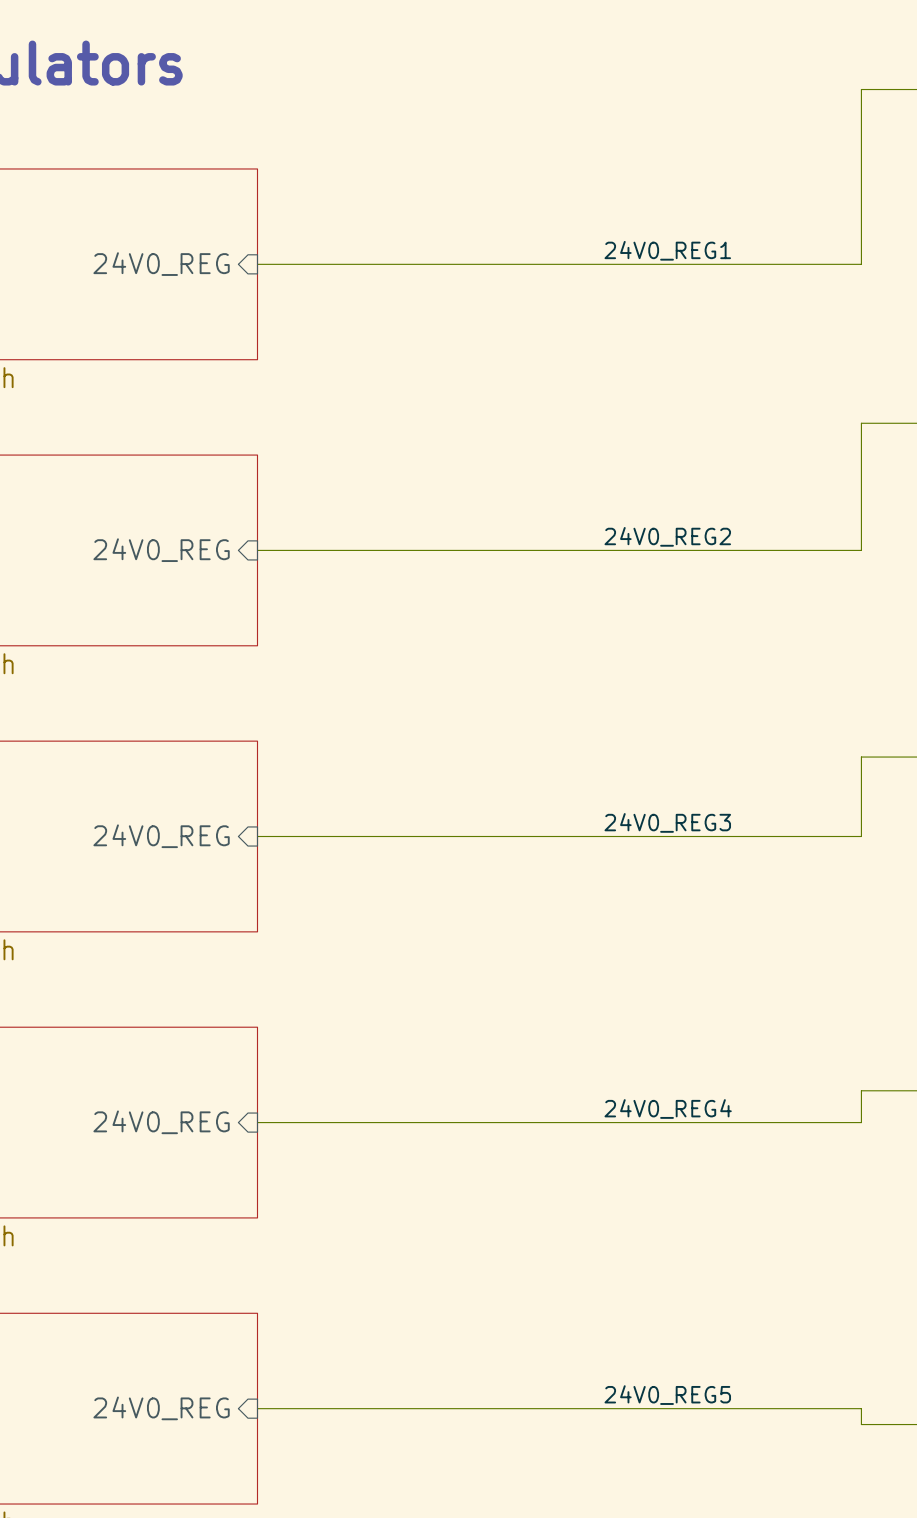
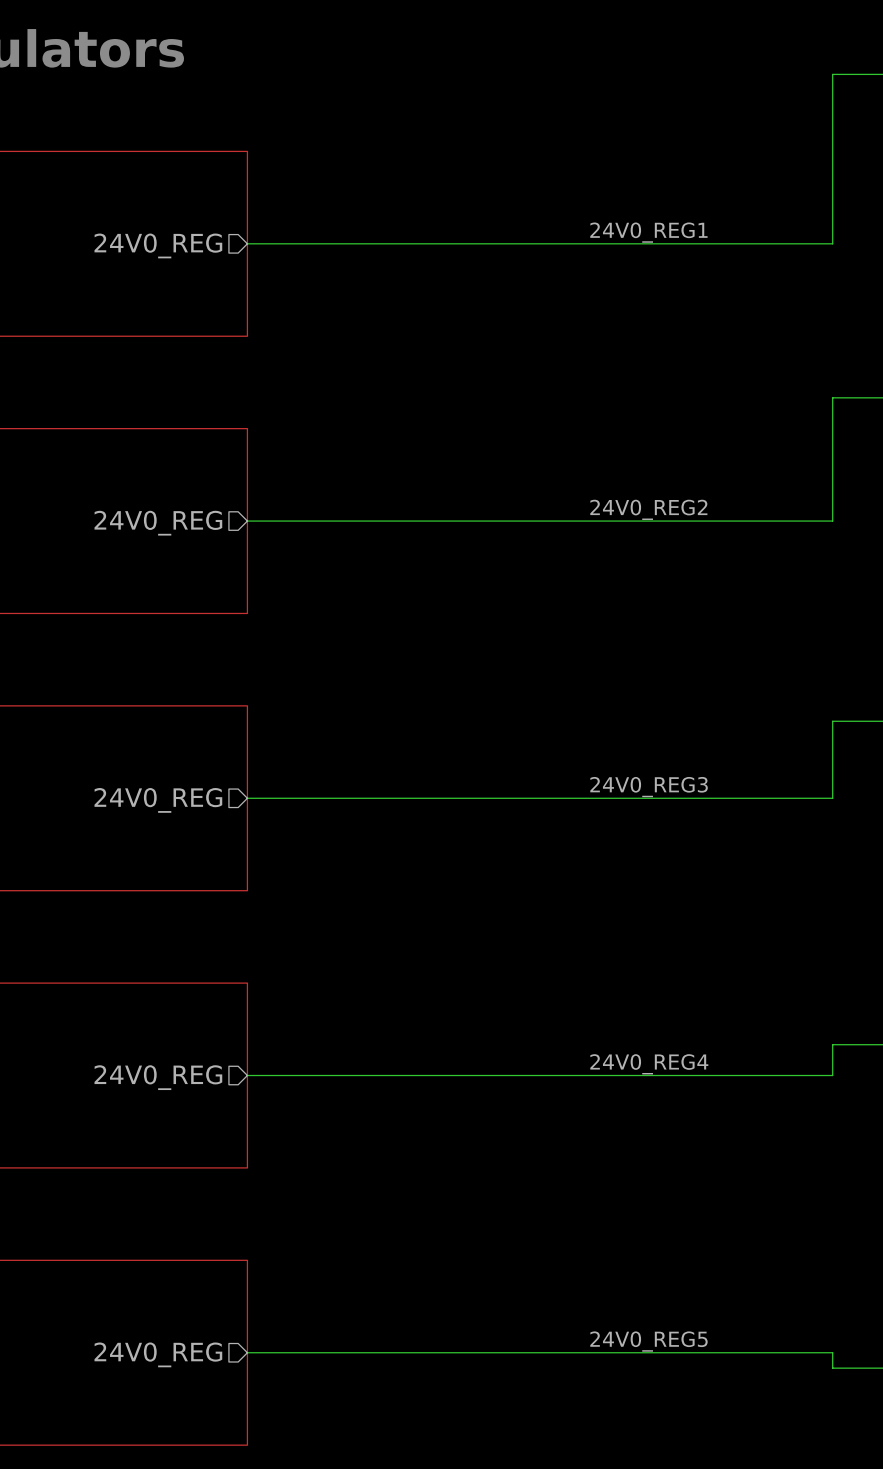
sheet pin shape: input (161, 264) -> output (158, 245)
sheet pin shape: input (161, 550) -> output (158, 523)
sheet pin shape: input (161, 836) -> output (158, 800)
sheet pin shape: input (161, 1122) -> output (158, 1077)
sheet pin shape: input (161, 1408) -> output (158, 1354)

